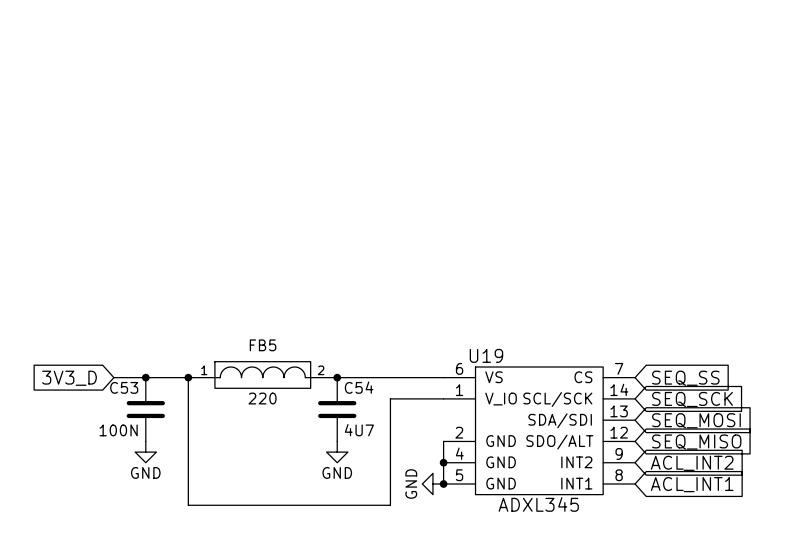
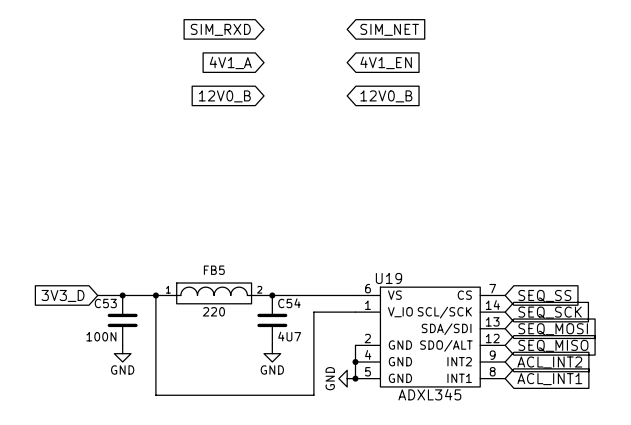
global label: none -> SIM_RXD (220, 29)
global label: none -> SIM_NET (389, 29)
global label: none -> 4V1_A (230, 62)
global label: none -> 4V1_EN (386, 62)
global label: none -> 12V0_B (224, 96)
global label: none -> 12V0_B (386, 96)

